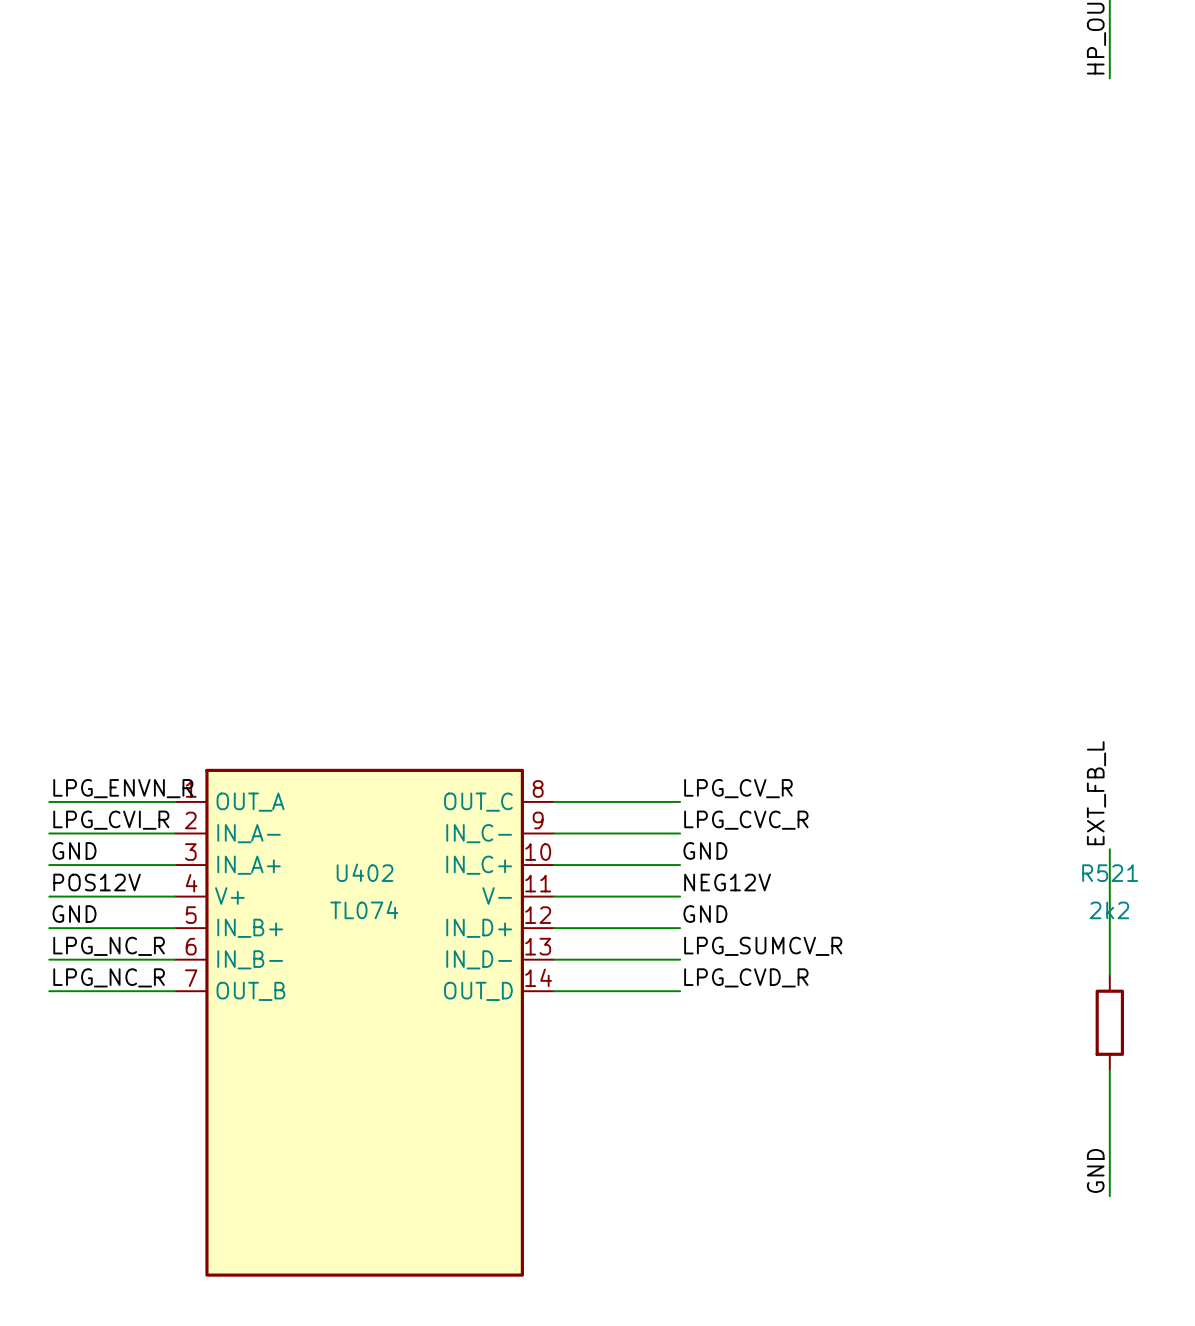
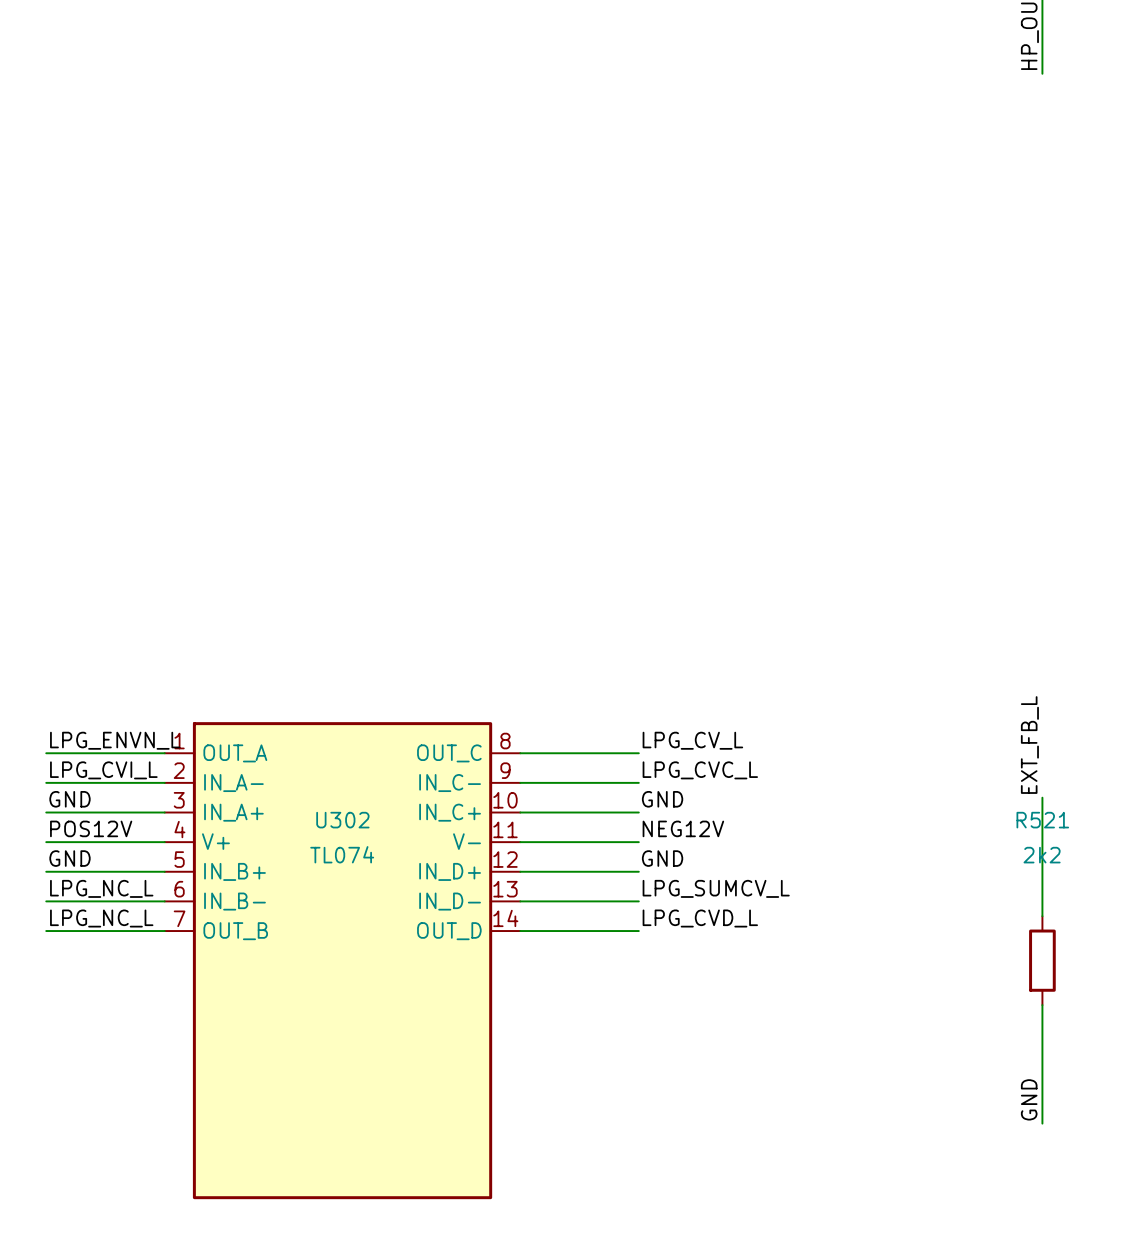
label: LPG_ENVN_R (123, 788) -> LPG_ENVN_L (115, 740)
label: LPG_CV_R (738, 788) -> LPG_CV_L (692, 740)
label: LPG_CVI_R (111, 820) -> LPG_CVI_L (103, 770)
label: LPG_CVC_R (746, 820) -> LPG_CVC_L (700, 770)
U402 name: U402 (365, 872) -> U302 (342, 820)
label: LPG_NC_R (109, 946) -> LPG_NC_L (101, 888)
label: LPG_SUMCV_R (763, 946) -> LPG_SUMCV_L (716, 888)
label: LPG_NC_R (109, 977) -> LPG_NC_L (101, 918)
label: LPG_CVD_R (746, 977) -> LPG_CVD_L (700, 918)

